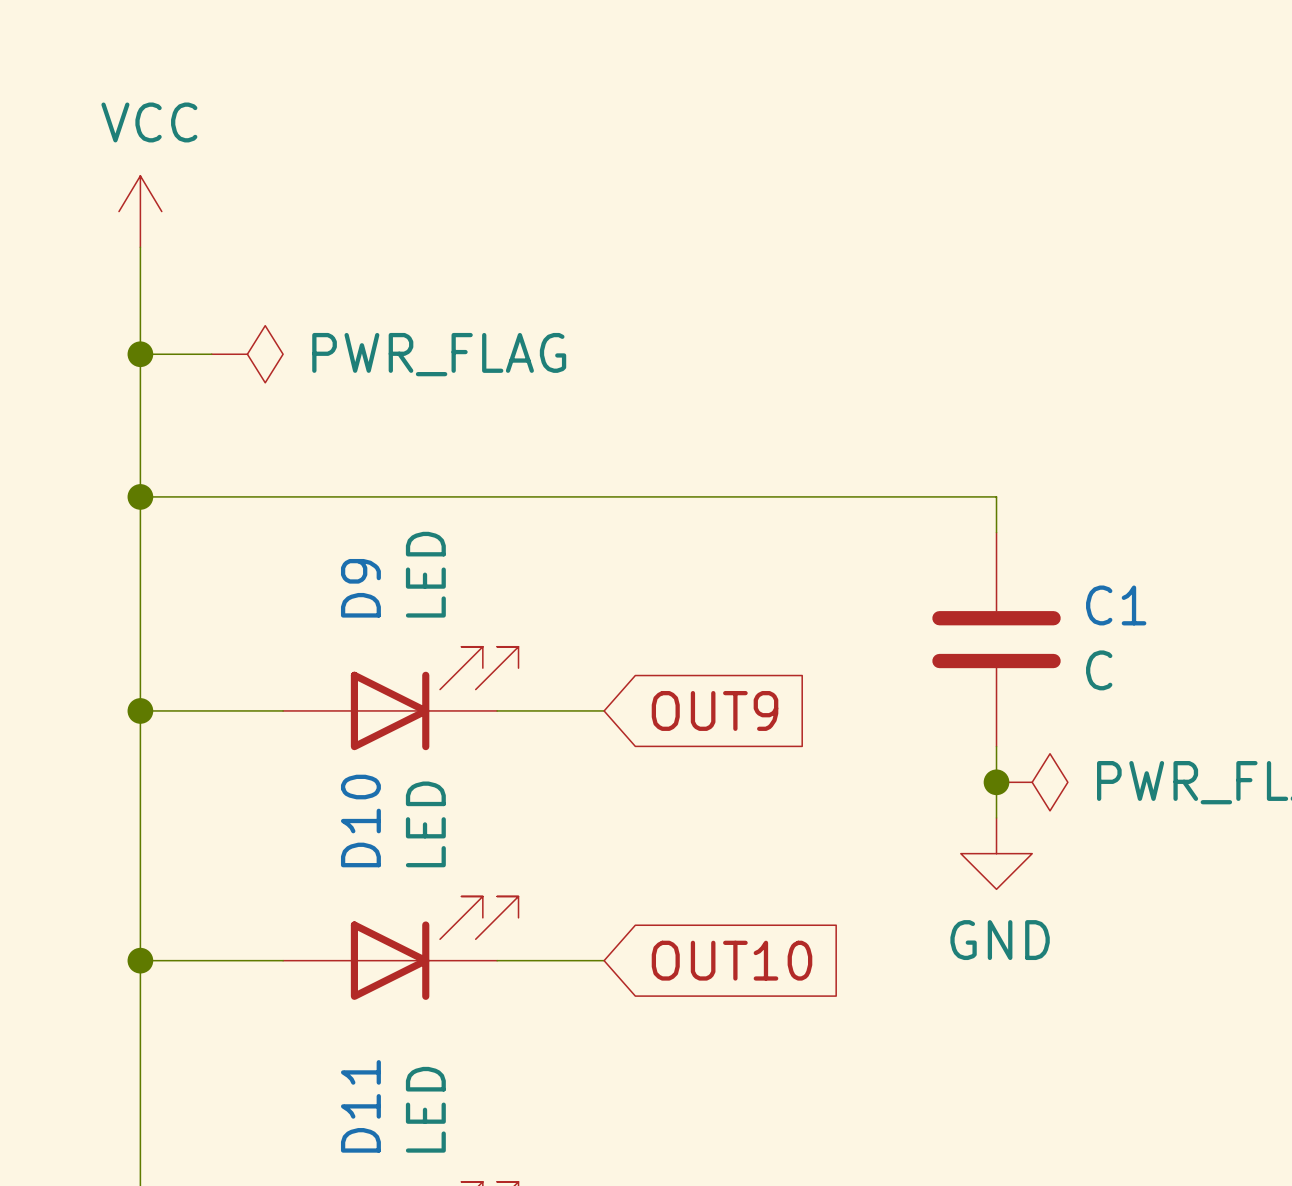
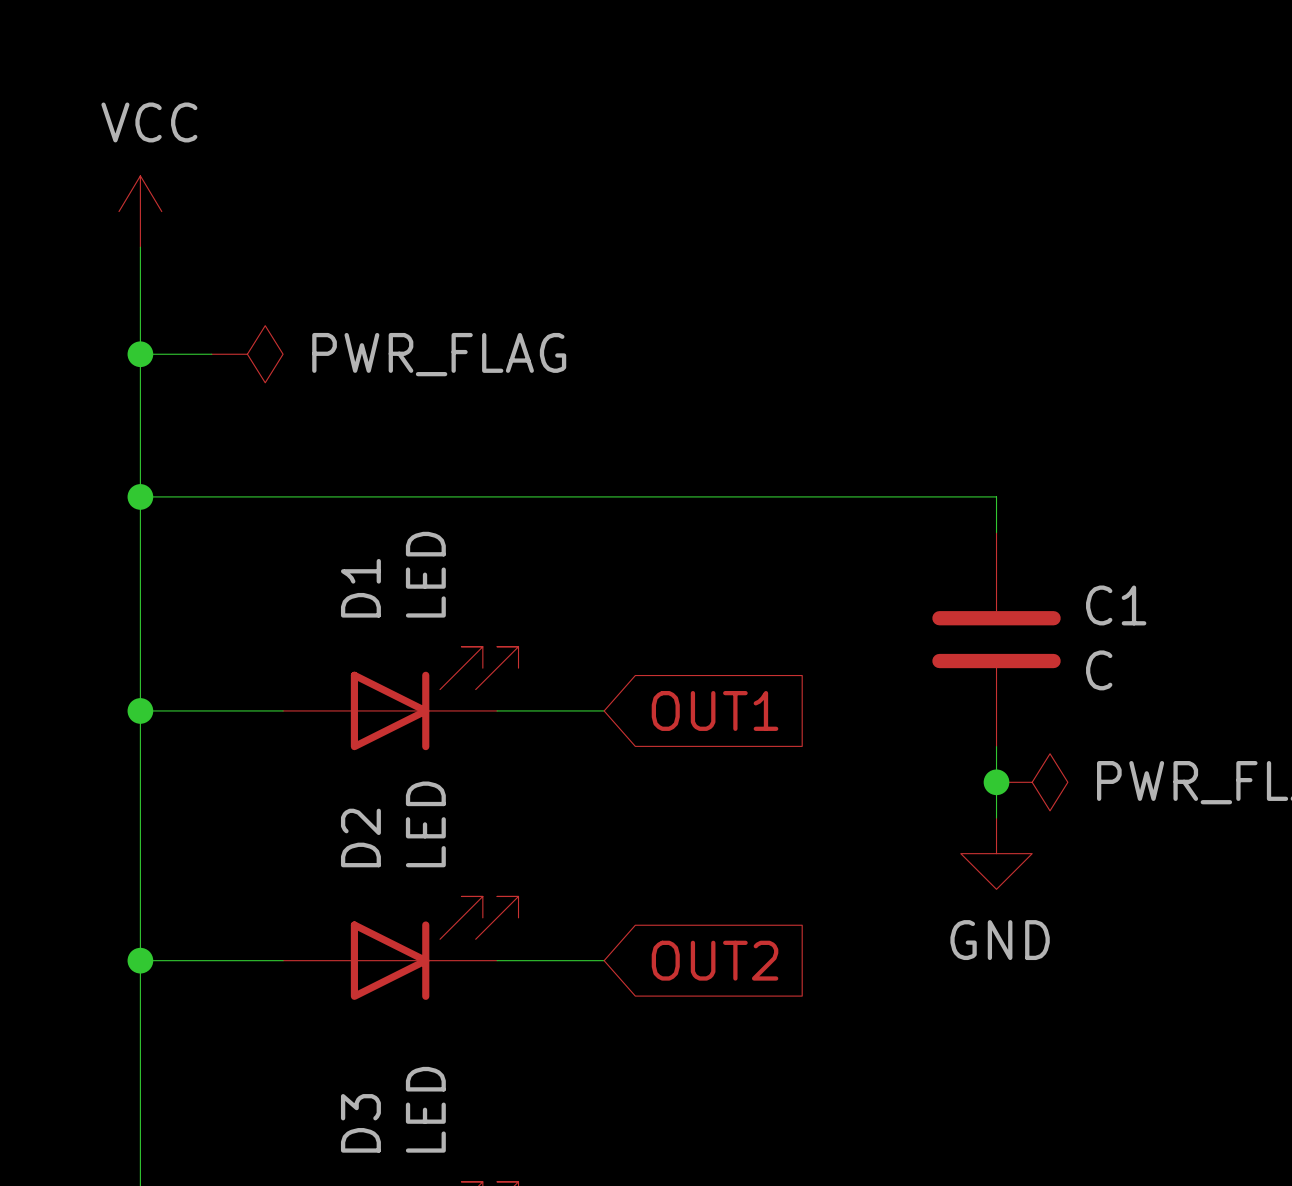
D9 name: D9 (360, 588) -> D1 (360, 588)
global label: OUT9 (715, 710) -> OUT1 (715, 710)
D10 name: D10 (360, 821) -> D2 (360, 837)
global label: OUT10 (732, 960) -> OUT2 (715, 960)
D11 name: D11 (360, 1106) -> D3 (360, 1123)

